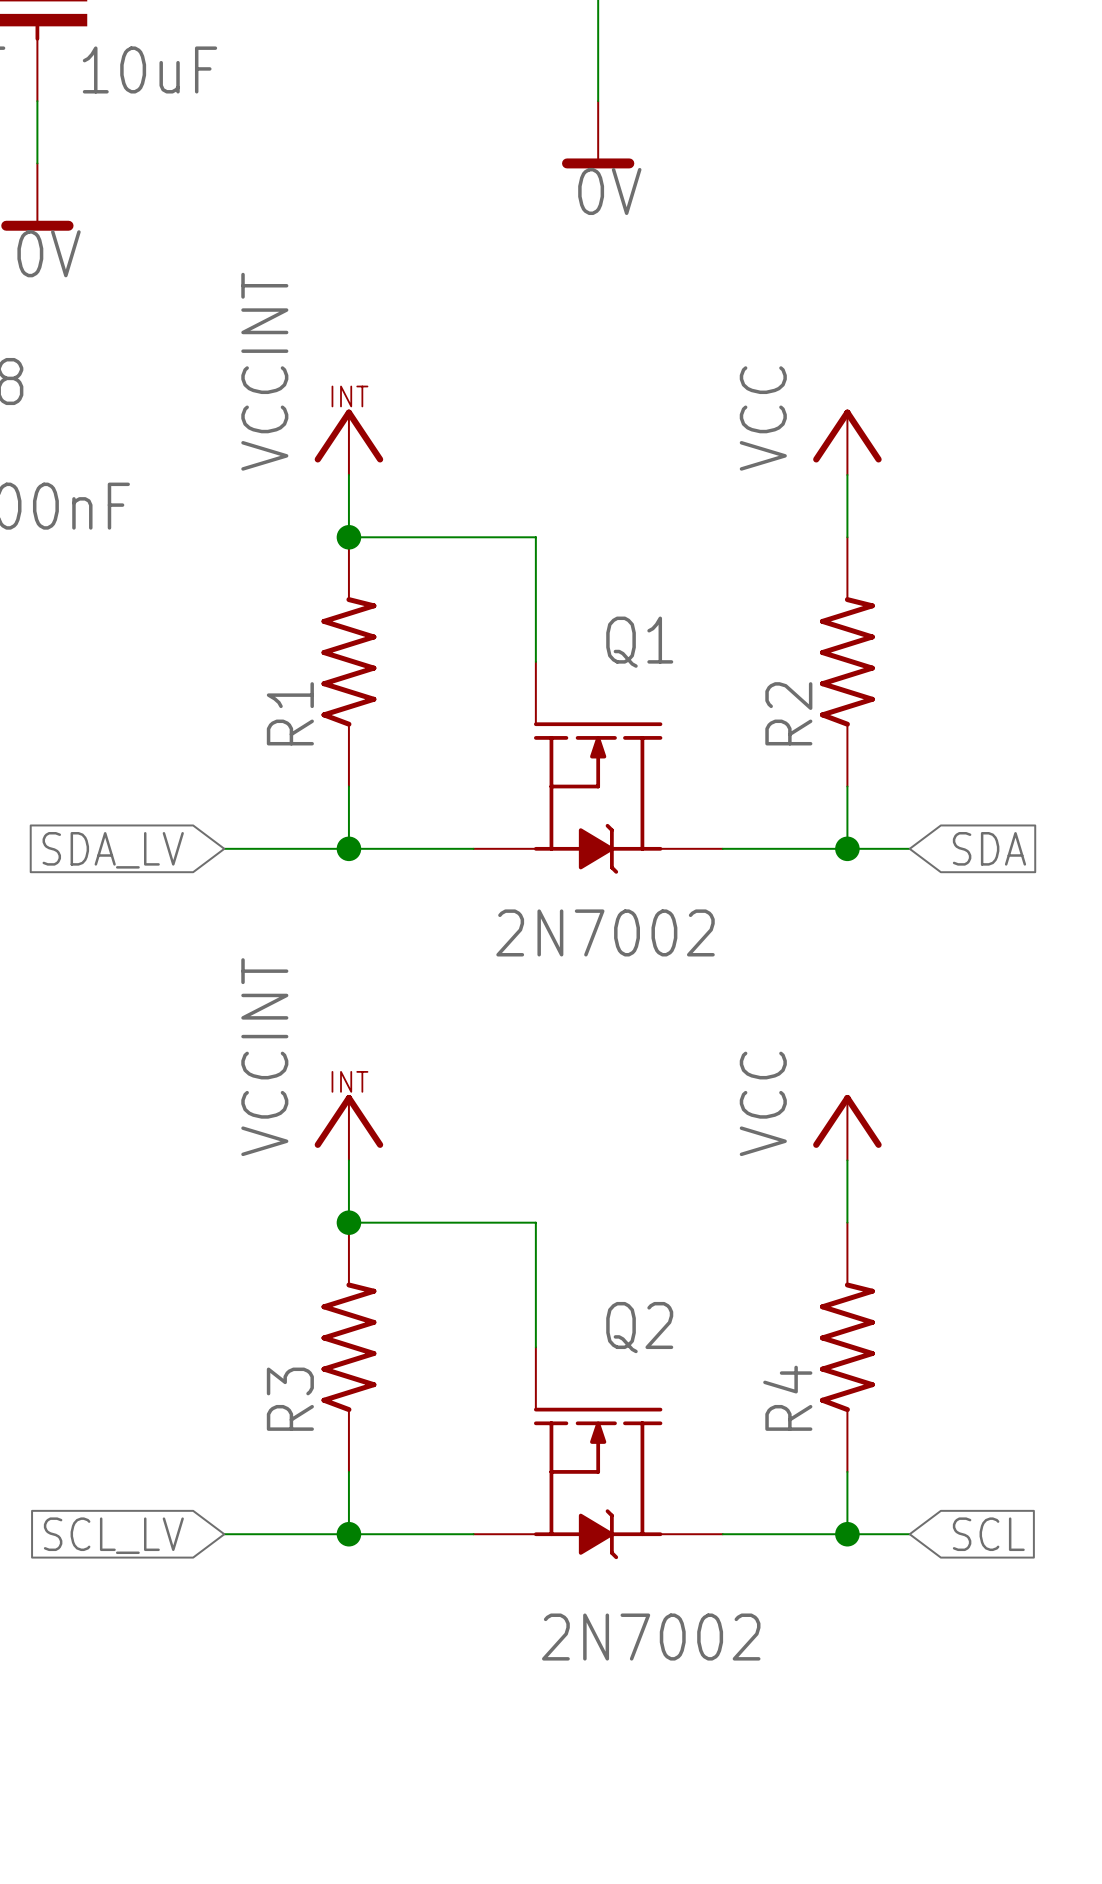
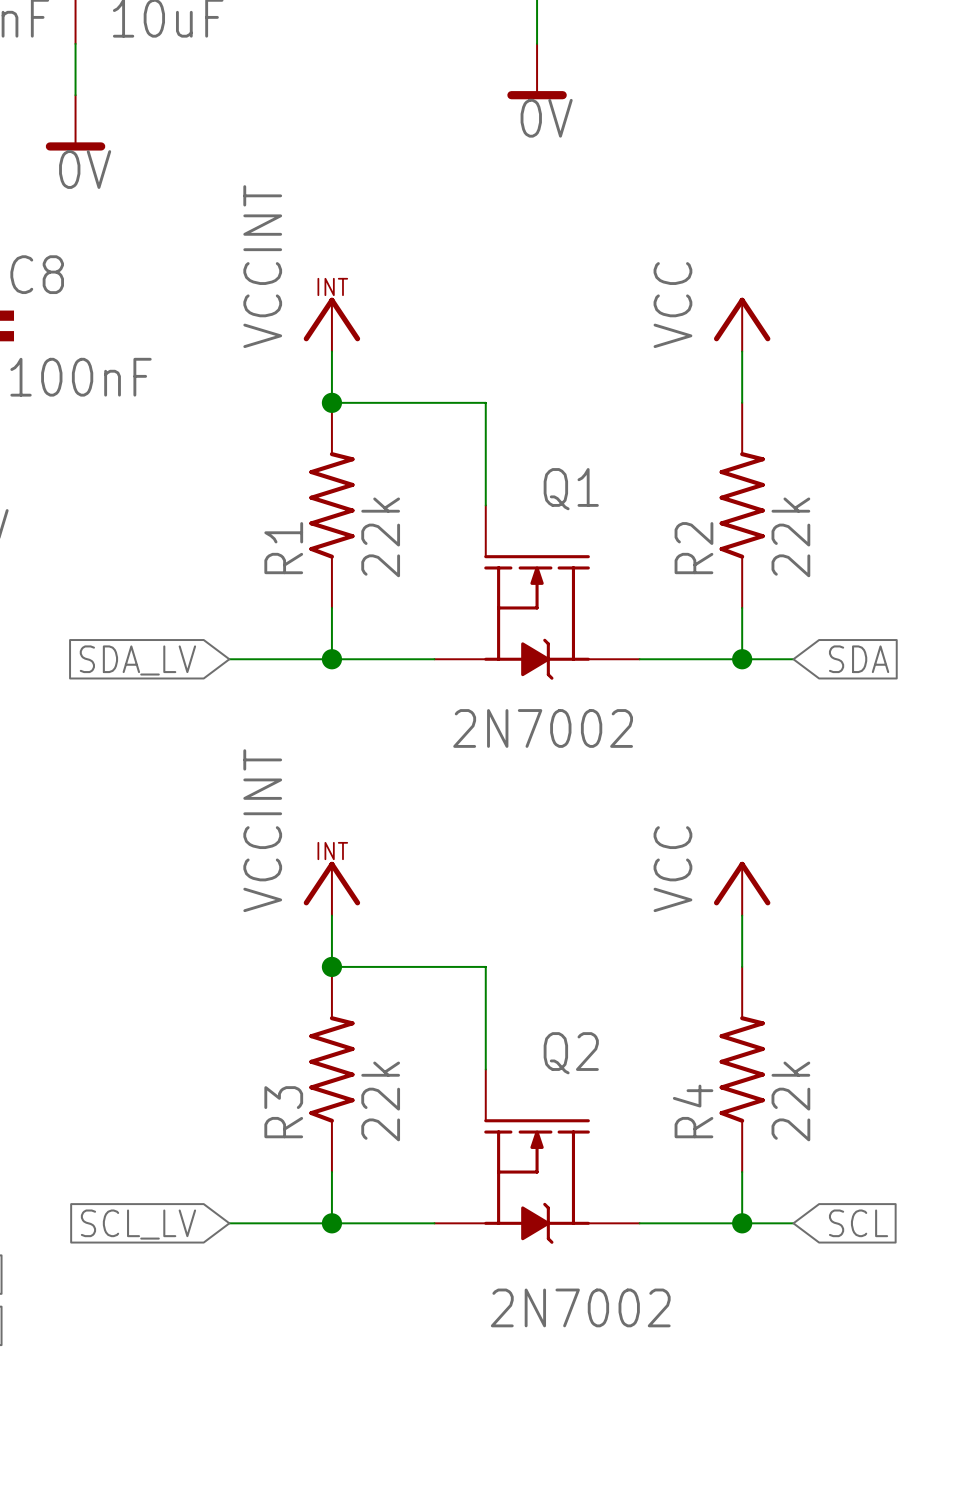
R1 value: none -> 22k (380, 537)
R2 value: none -> 22k (790, 537)
R3 value: none -> 22k (380, 1101)
R4 value: none -> 22k (790, 1101)

